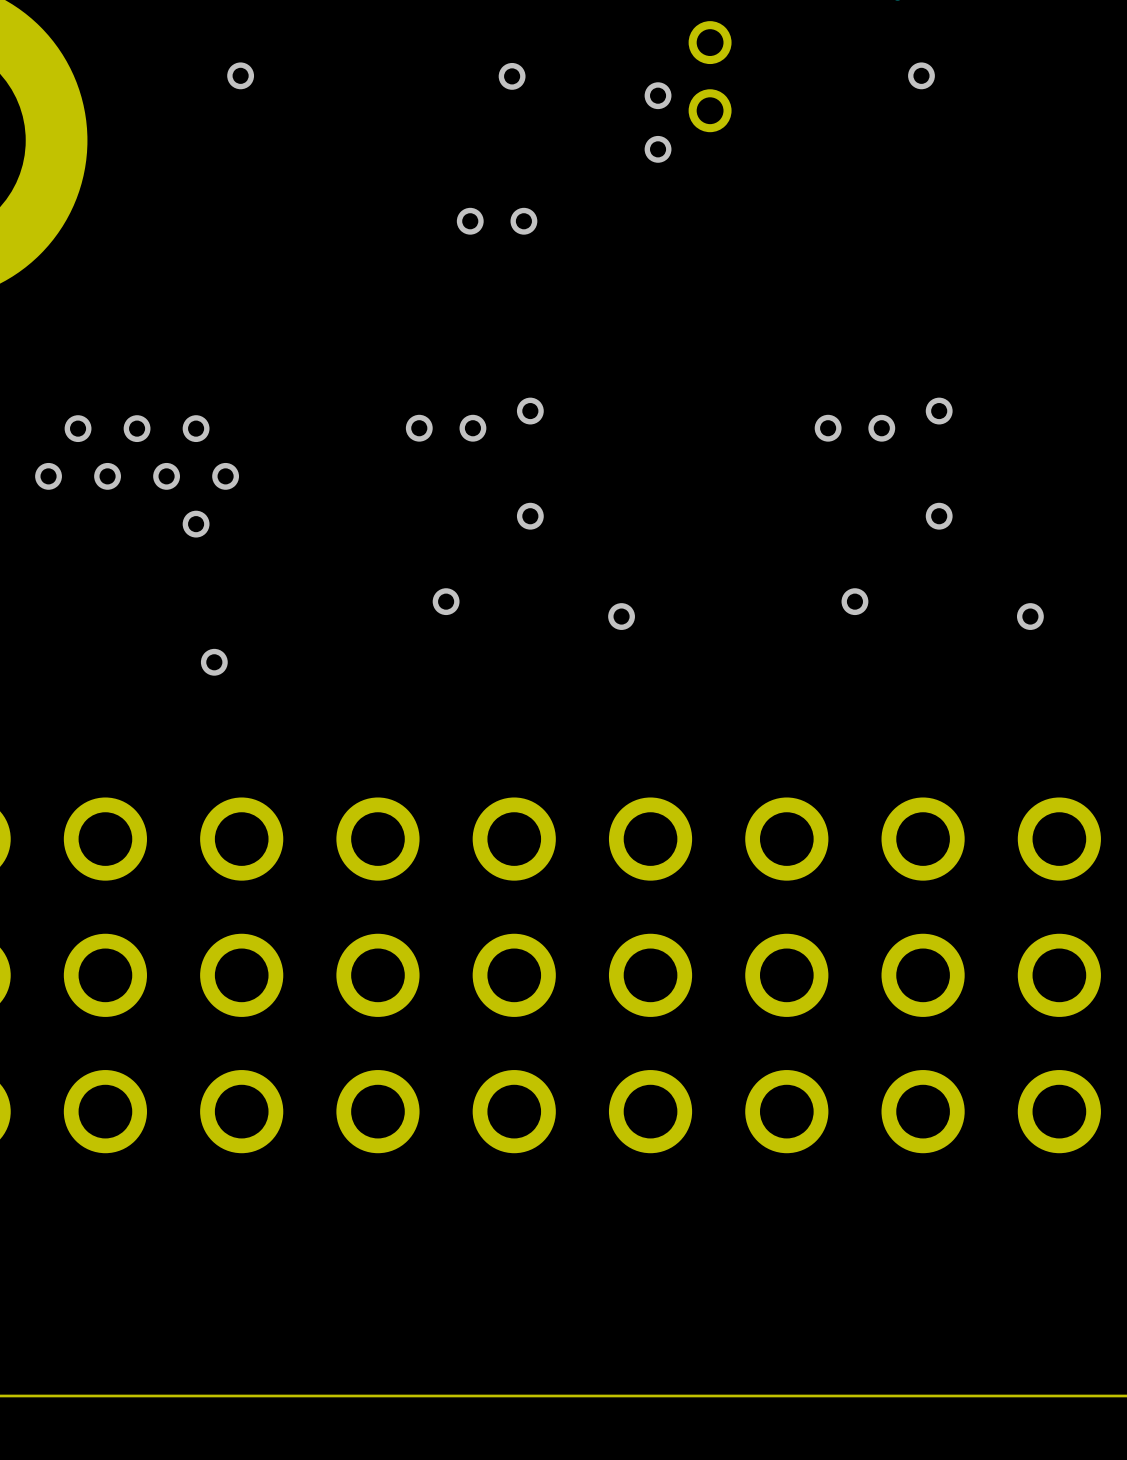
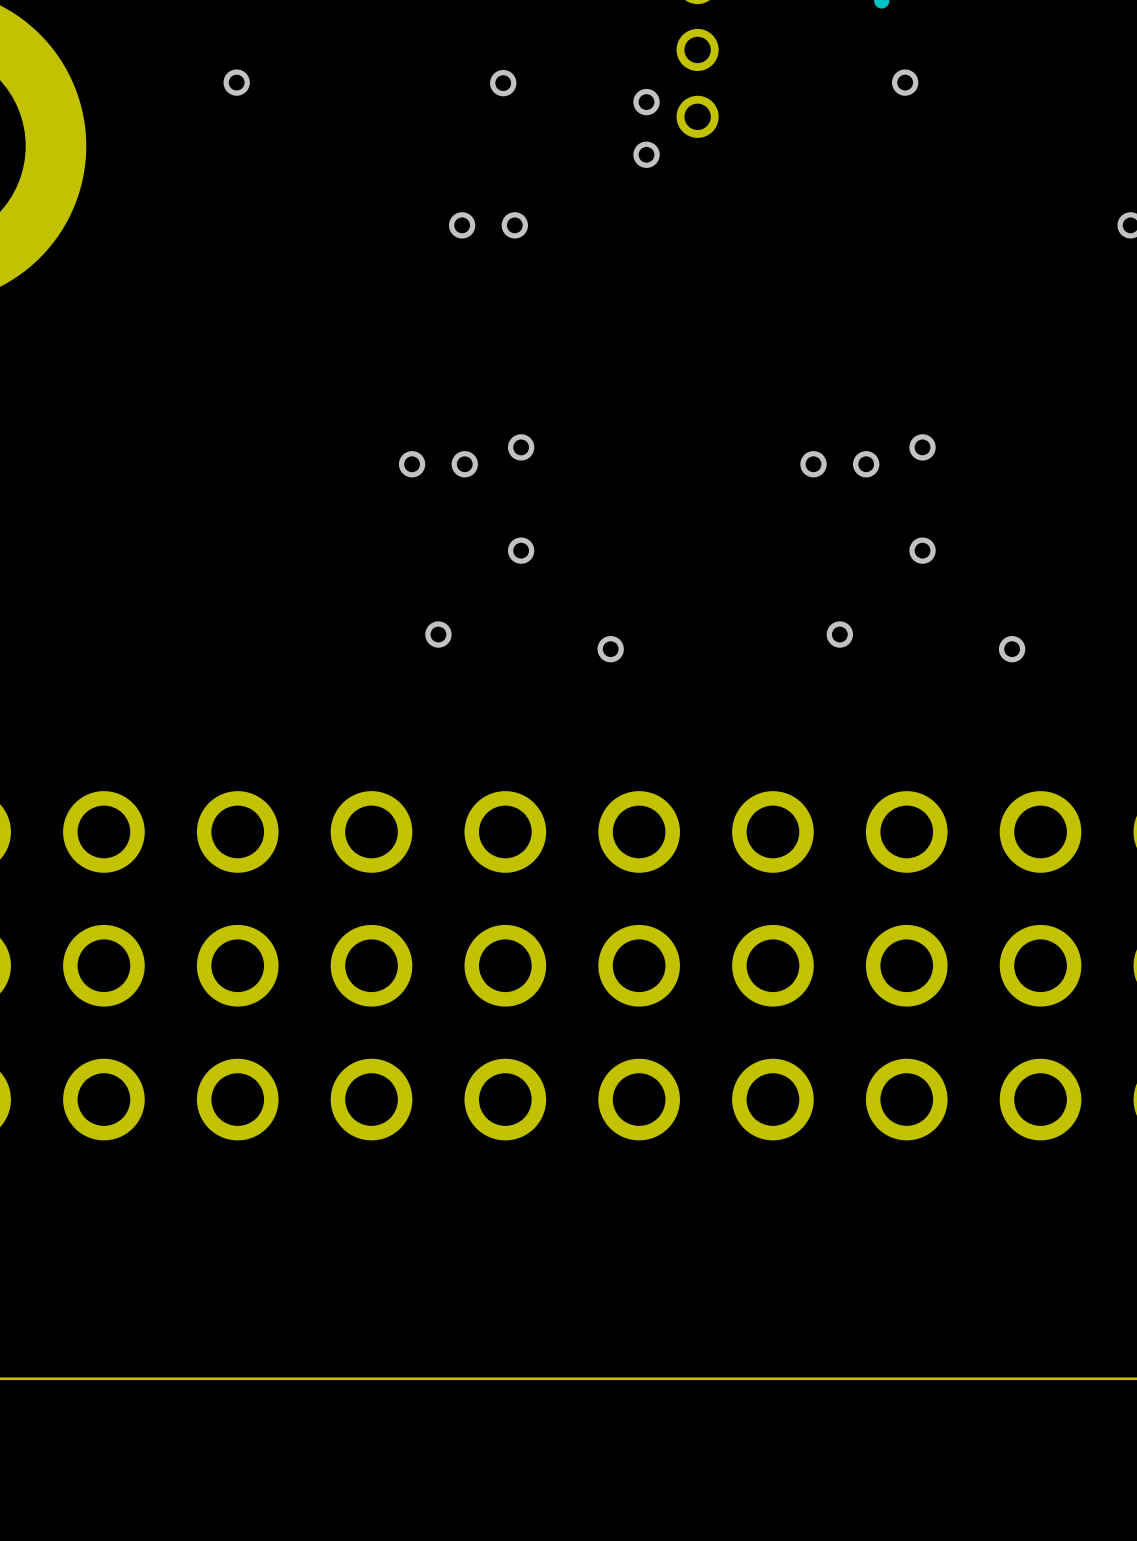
via: (530, 411) -> none
via: (939, 411) -> none
via: (78, 428) -> none
via: (137, 428) -> none
via: (196, 428) -> none
via: (419, 428) -> none
via: (472, 428) -> none
via: (828, 428) -> none
via: (881, 428) -> none
via: none -> (521, 447)
via: none -> (922, 447)
via: none -> (412, 464)
via: none -> (464, 464)
via: none -> (813, 464)
via: none -> (866, 464)
via: (48, 476) -> none
via: (107, 476) -> none
via: (166, 476) -> none
via: (225, 476) -> none
via: (530, 516) -> none
via: (939, 516) -> none
via: (196, 524) -> none
via: none -> (521, 550)
via: none -> (922, 550)
via position: (446, 601) -> (438, 634)
via position: (854, 601) -> (839, 634)
via position: (621, 616) -> (610, 649)
via position: (1030, 616) -> (1012, 649)
via: (214, 662) -> none

